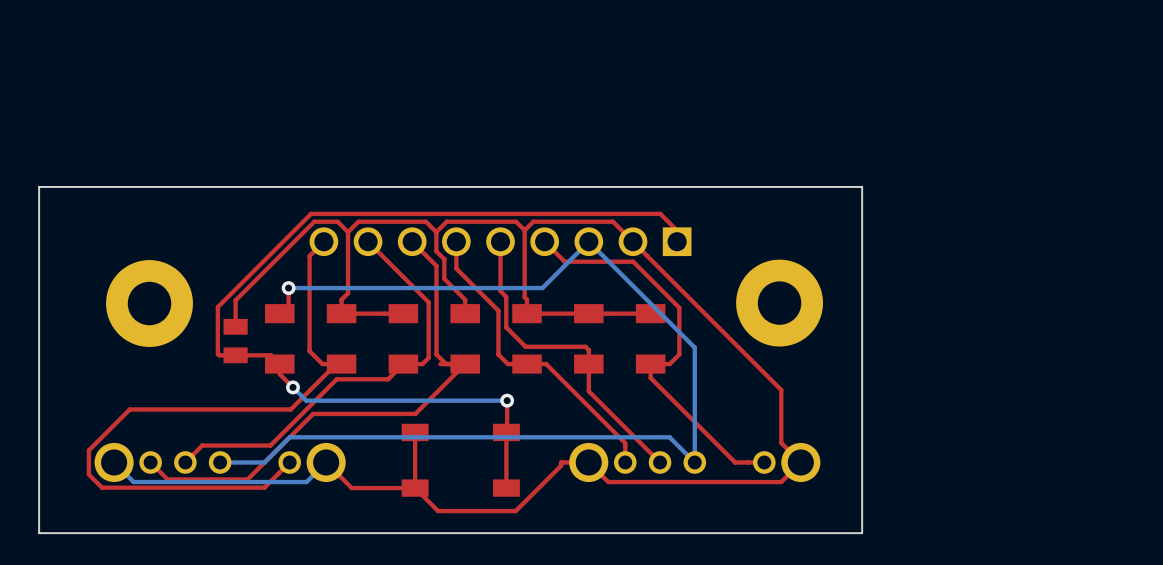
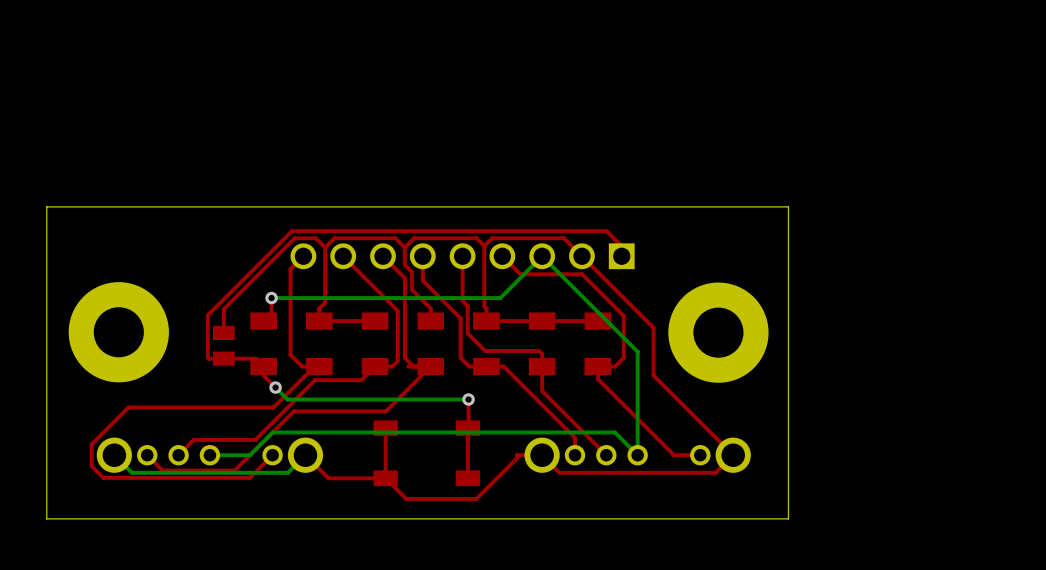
part: (149, 303) -> none
part: (779, 303) -> none
top track: (712, 321) (781, 390) (781, 442) -> (653, 327) (653, 375) (715, 437)
part: none -> (118, 332)
part: none -> (718, 332)

